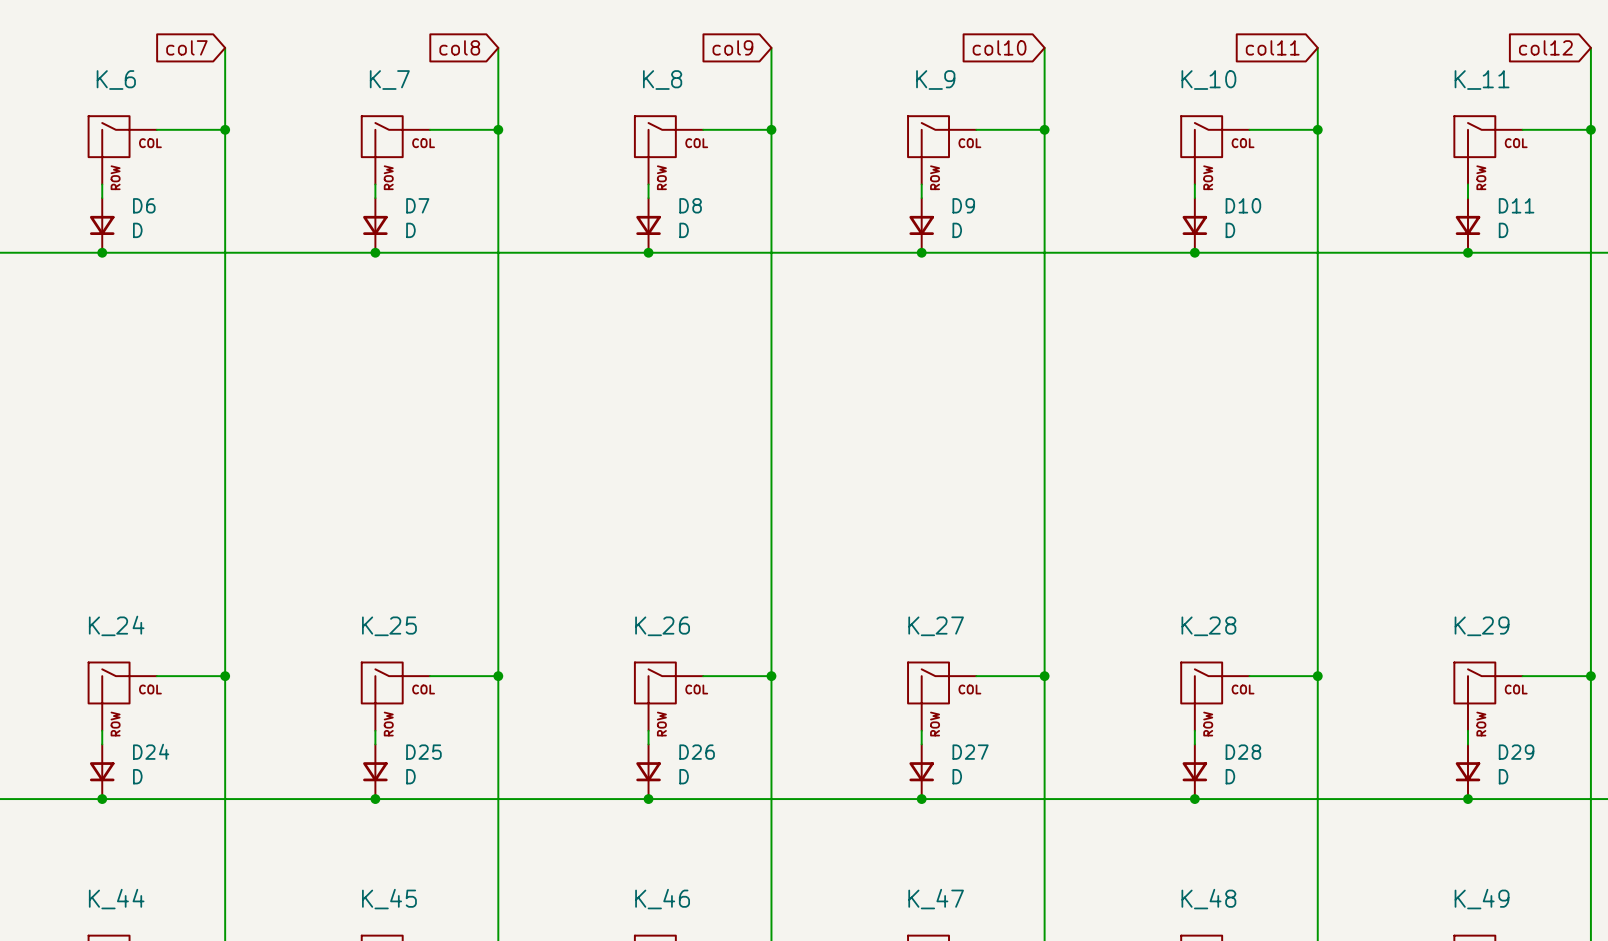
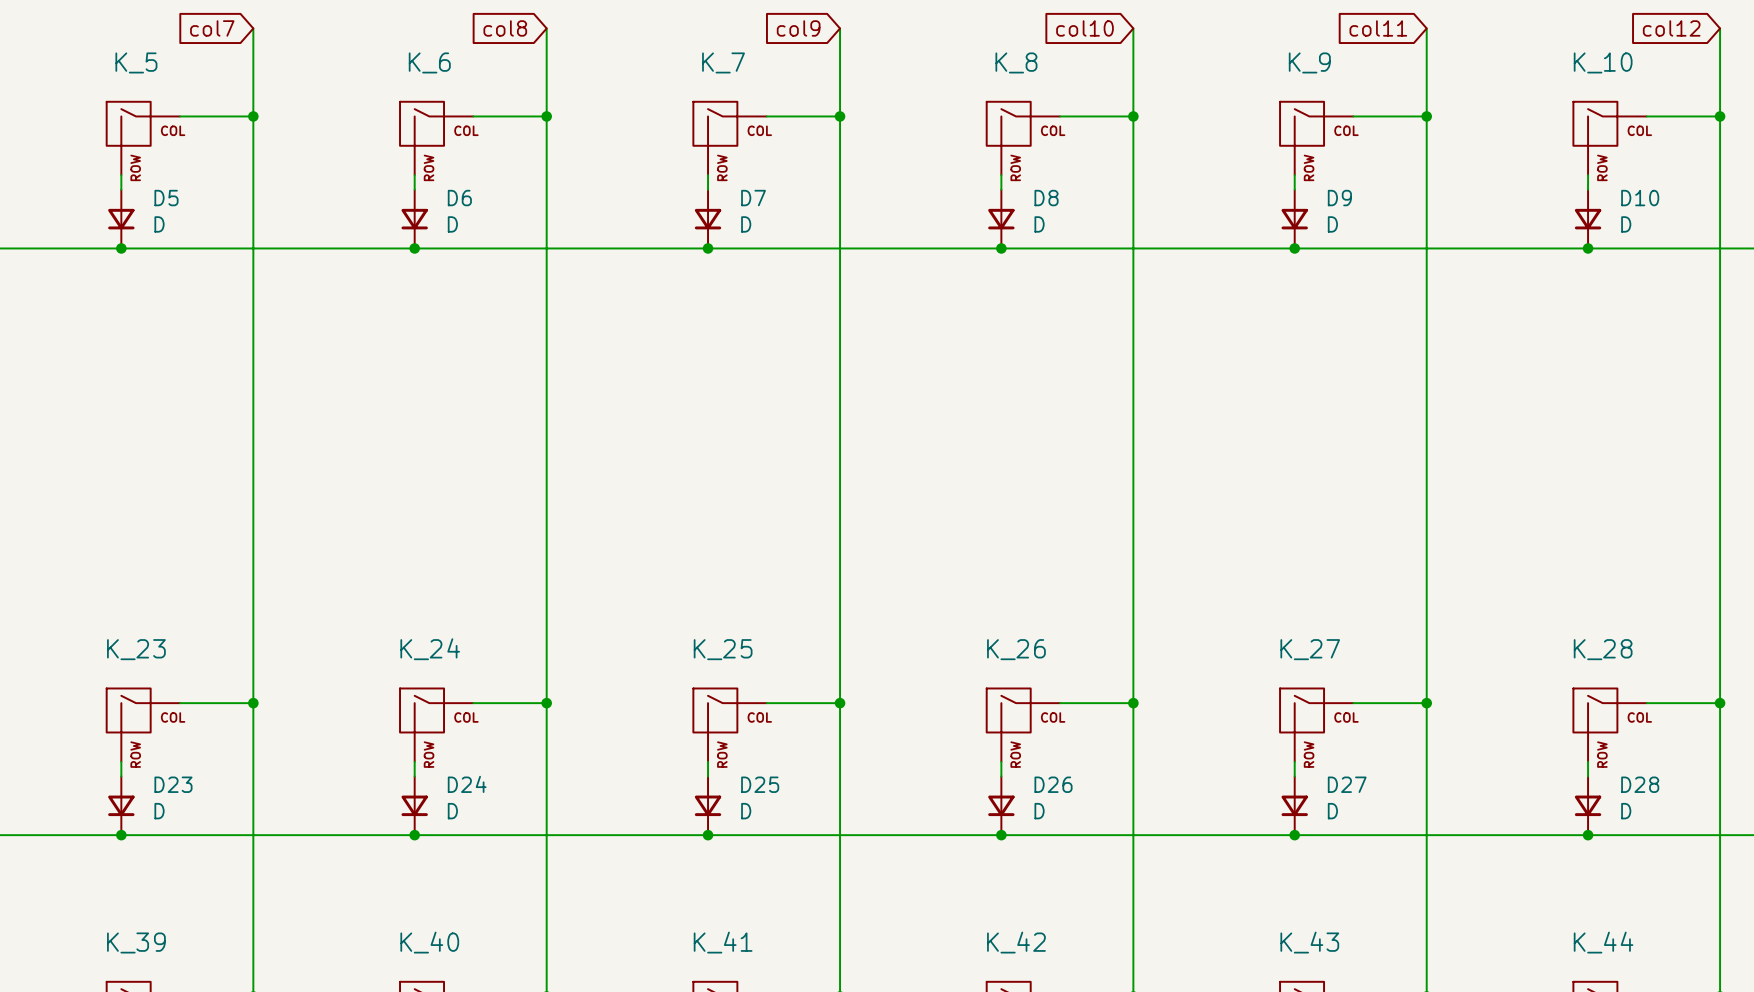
K_6 name: K_6 (116, 80) -> K_5 (136, 62)
K_7 name: K_7 (389, 80) -> K_6 (429, 62)
K_8 name: K_8 (662, 80) -> K_7 (723, 62)
K_9 name: K_9 (935, 80) -> K_8 (1016, 62)
K_10 name: K_10 (1208, 80) -> K_9 (1309, 62)
K_11 name: K_11 (1482, 80) -> K_10 (1603, 62)
D6 name: D6 (144, 205) -> D5 (166, 198)
D7 name: D7 (417, 205) -> D6 (459, 198)
D8 name: D8 (690, 205) -> D7 (753, 198)
D9 name: D9 (963, 205) -> D8 (1046, 198)
D10 name: D10 (1243, 205) -> D9 (1339, 198)
D11 name: D11 (1516, 205) -> D10 (1640, 198)
K_24 name: K_24 (116, 625) -> K_23 (136, 649)
K_25 name: K_25 (389, 626) -> K_24 (430, 649)
K_26 name: K_26 (662, 626) -> K_25 (723, 649)
K_27 name: K_27 (936, 626) -> K_26 (1016, 649)
K_28 name: K_28 (1208, 626) -> K_27 (1310, 649)
K_29 name: K_29 (1482, 626) -> K_28 (1603, 649)
D24 name: D24 (151, 751) -> D23 (173, 784)
D25 name: D25 (423, 752) -> D24 (467, 784)
D26 name: D26 (697, 752) -> D25 (760, 784)
D27 name: D27 (970, 752) -> D26 (1053, 784)
D28 name: D28 (1243, 752) -> D27 (1347, 784)
D29 name: D29 (1516, 752) -> D28 (1640, 784)
K_44 name: K_44 (116, 899) -> K_39 (136, 942)
K_45 name: K_45 (389, 899) -> K_40 (429, 942)
K_46 name: K_46 (662, 899) -> K_41 (723, 942)
K_47 name: K_47 (936, 899) -> K_42 (1016, 942)
K_48 name: K_48 (1208, 899) -> K_43 (1309, 942)
K_49 name: K_49 (1482, 899) -> K_44 (1603, 942)

